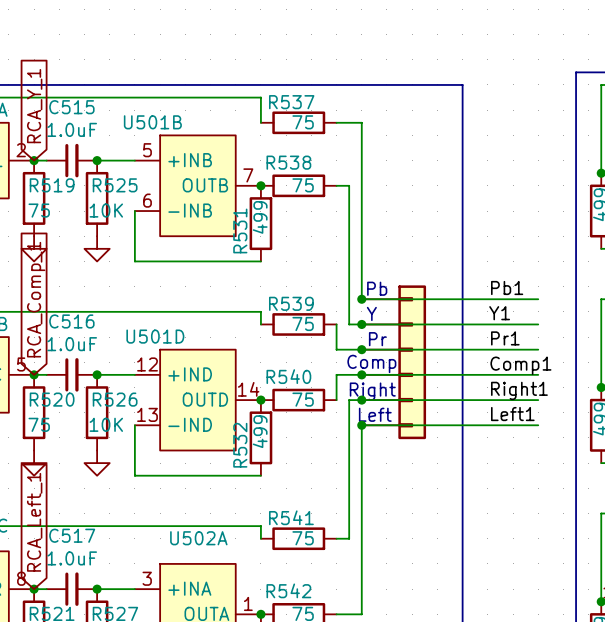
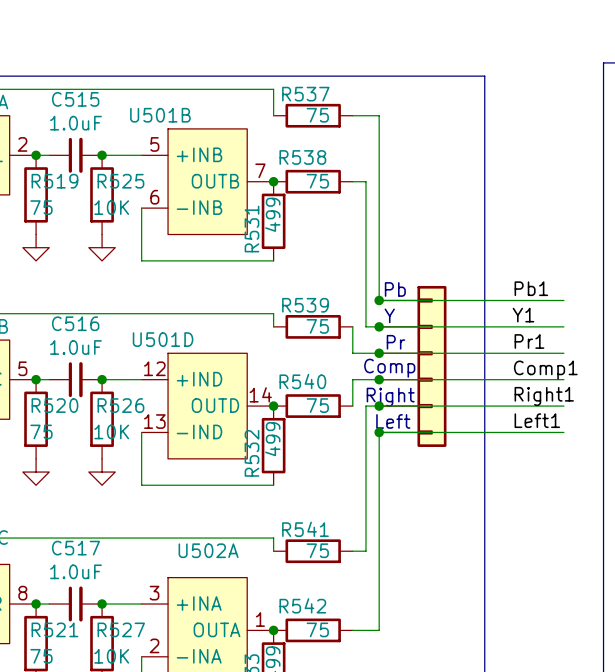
global label: RCA_Y_1 (34, 106) -> none
global label: RCA_Comp_1 (36, 299) -> none
global label: RCA_Left_1 (34, 522) -> none

